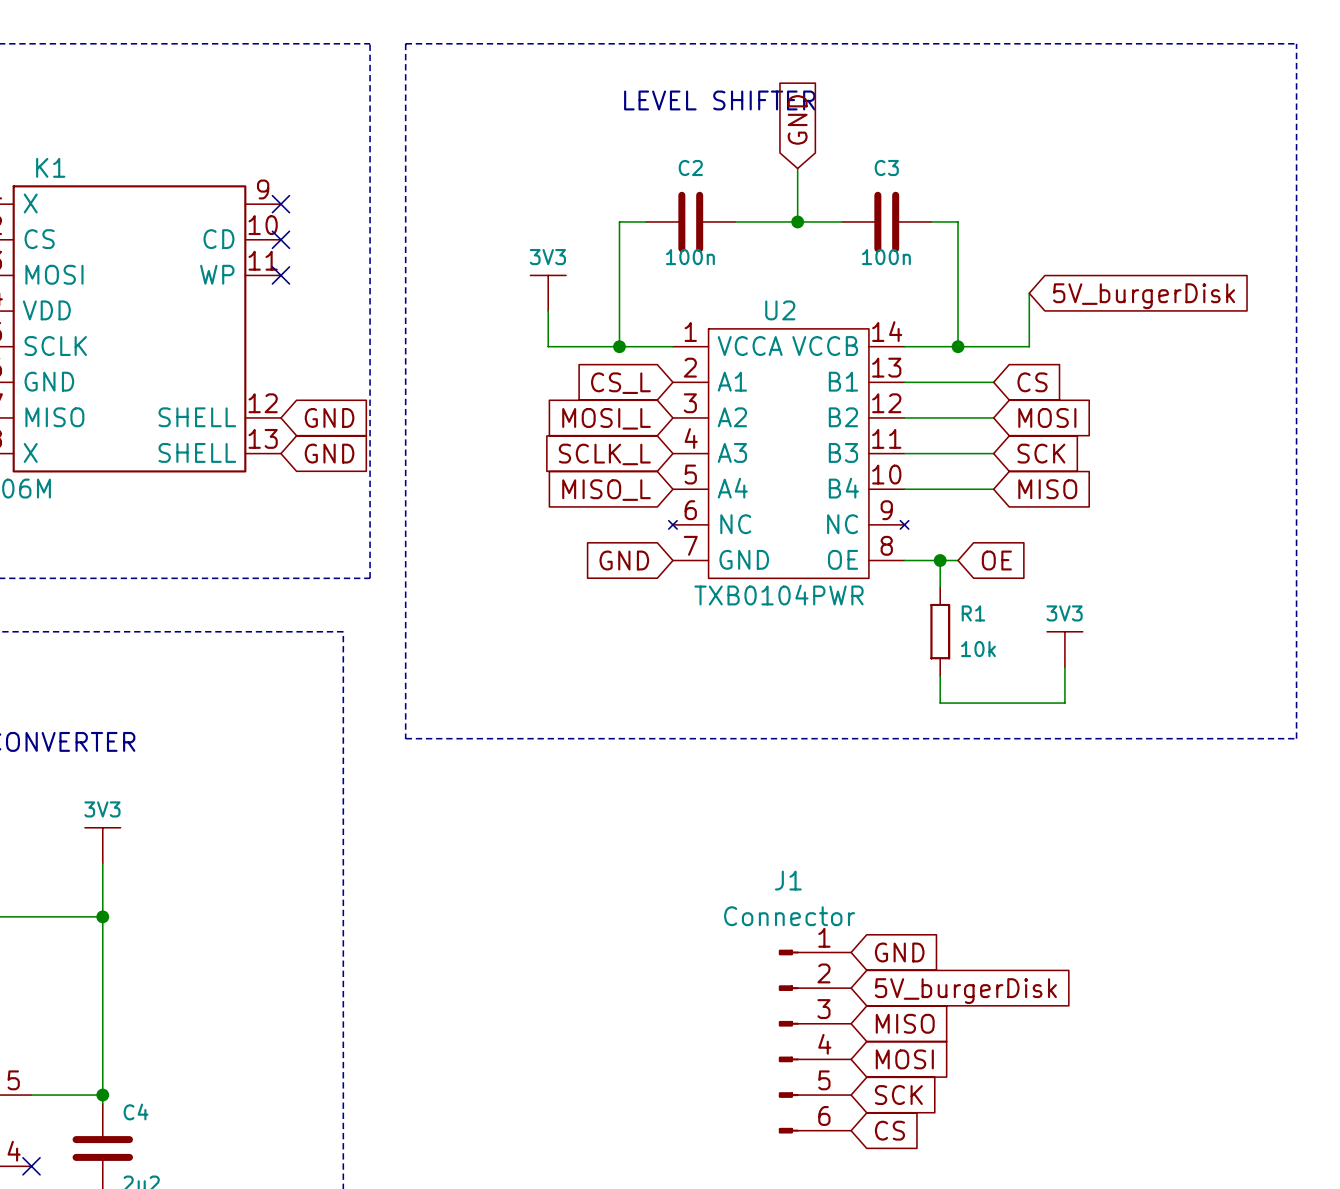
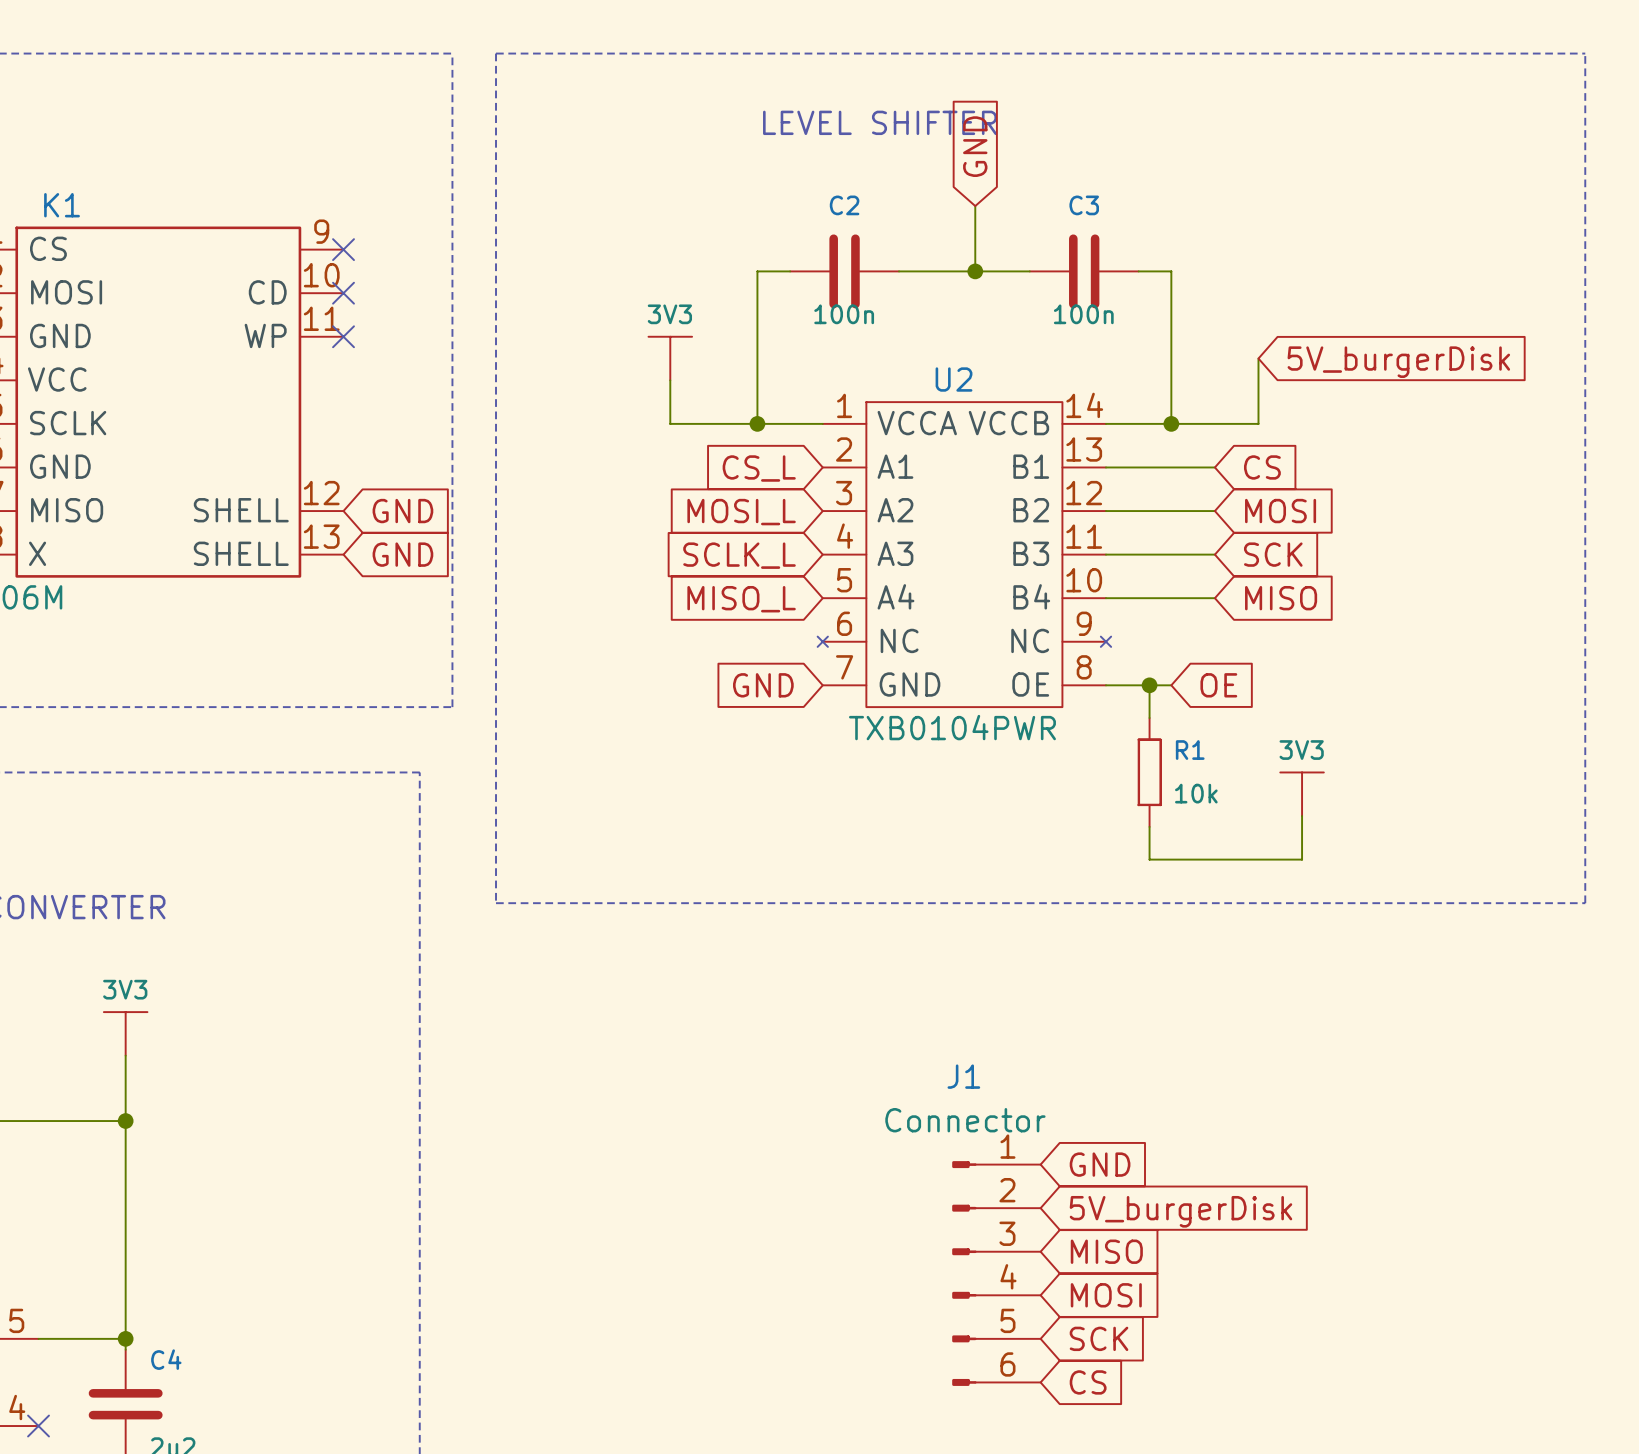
K1 pin name: X (30, 203) -> CS (48, 248)
K1 pin name: CS (39, 239) -> MOSI (66, 292)
K1 pin name: MOSI (54, 274) -> GND (60, 335)
K1 pin name: VDD (46, 310) -> VCC (57, 379)

